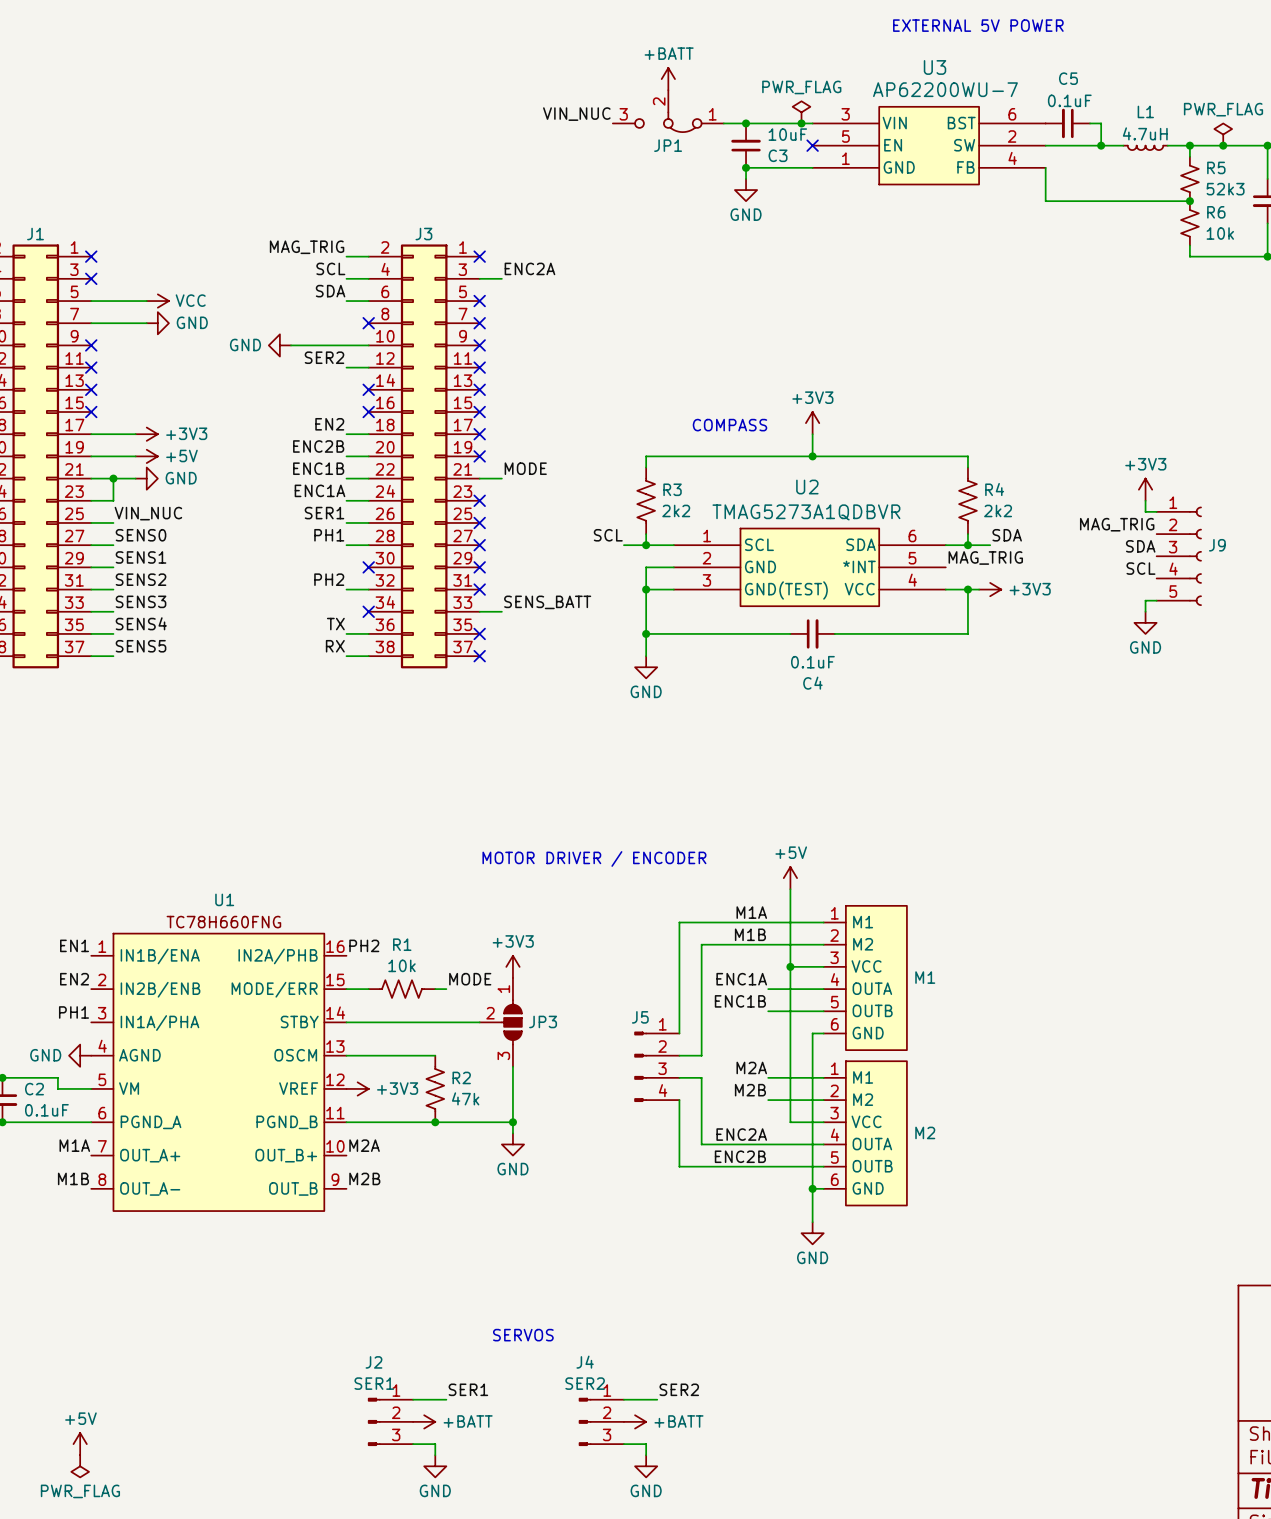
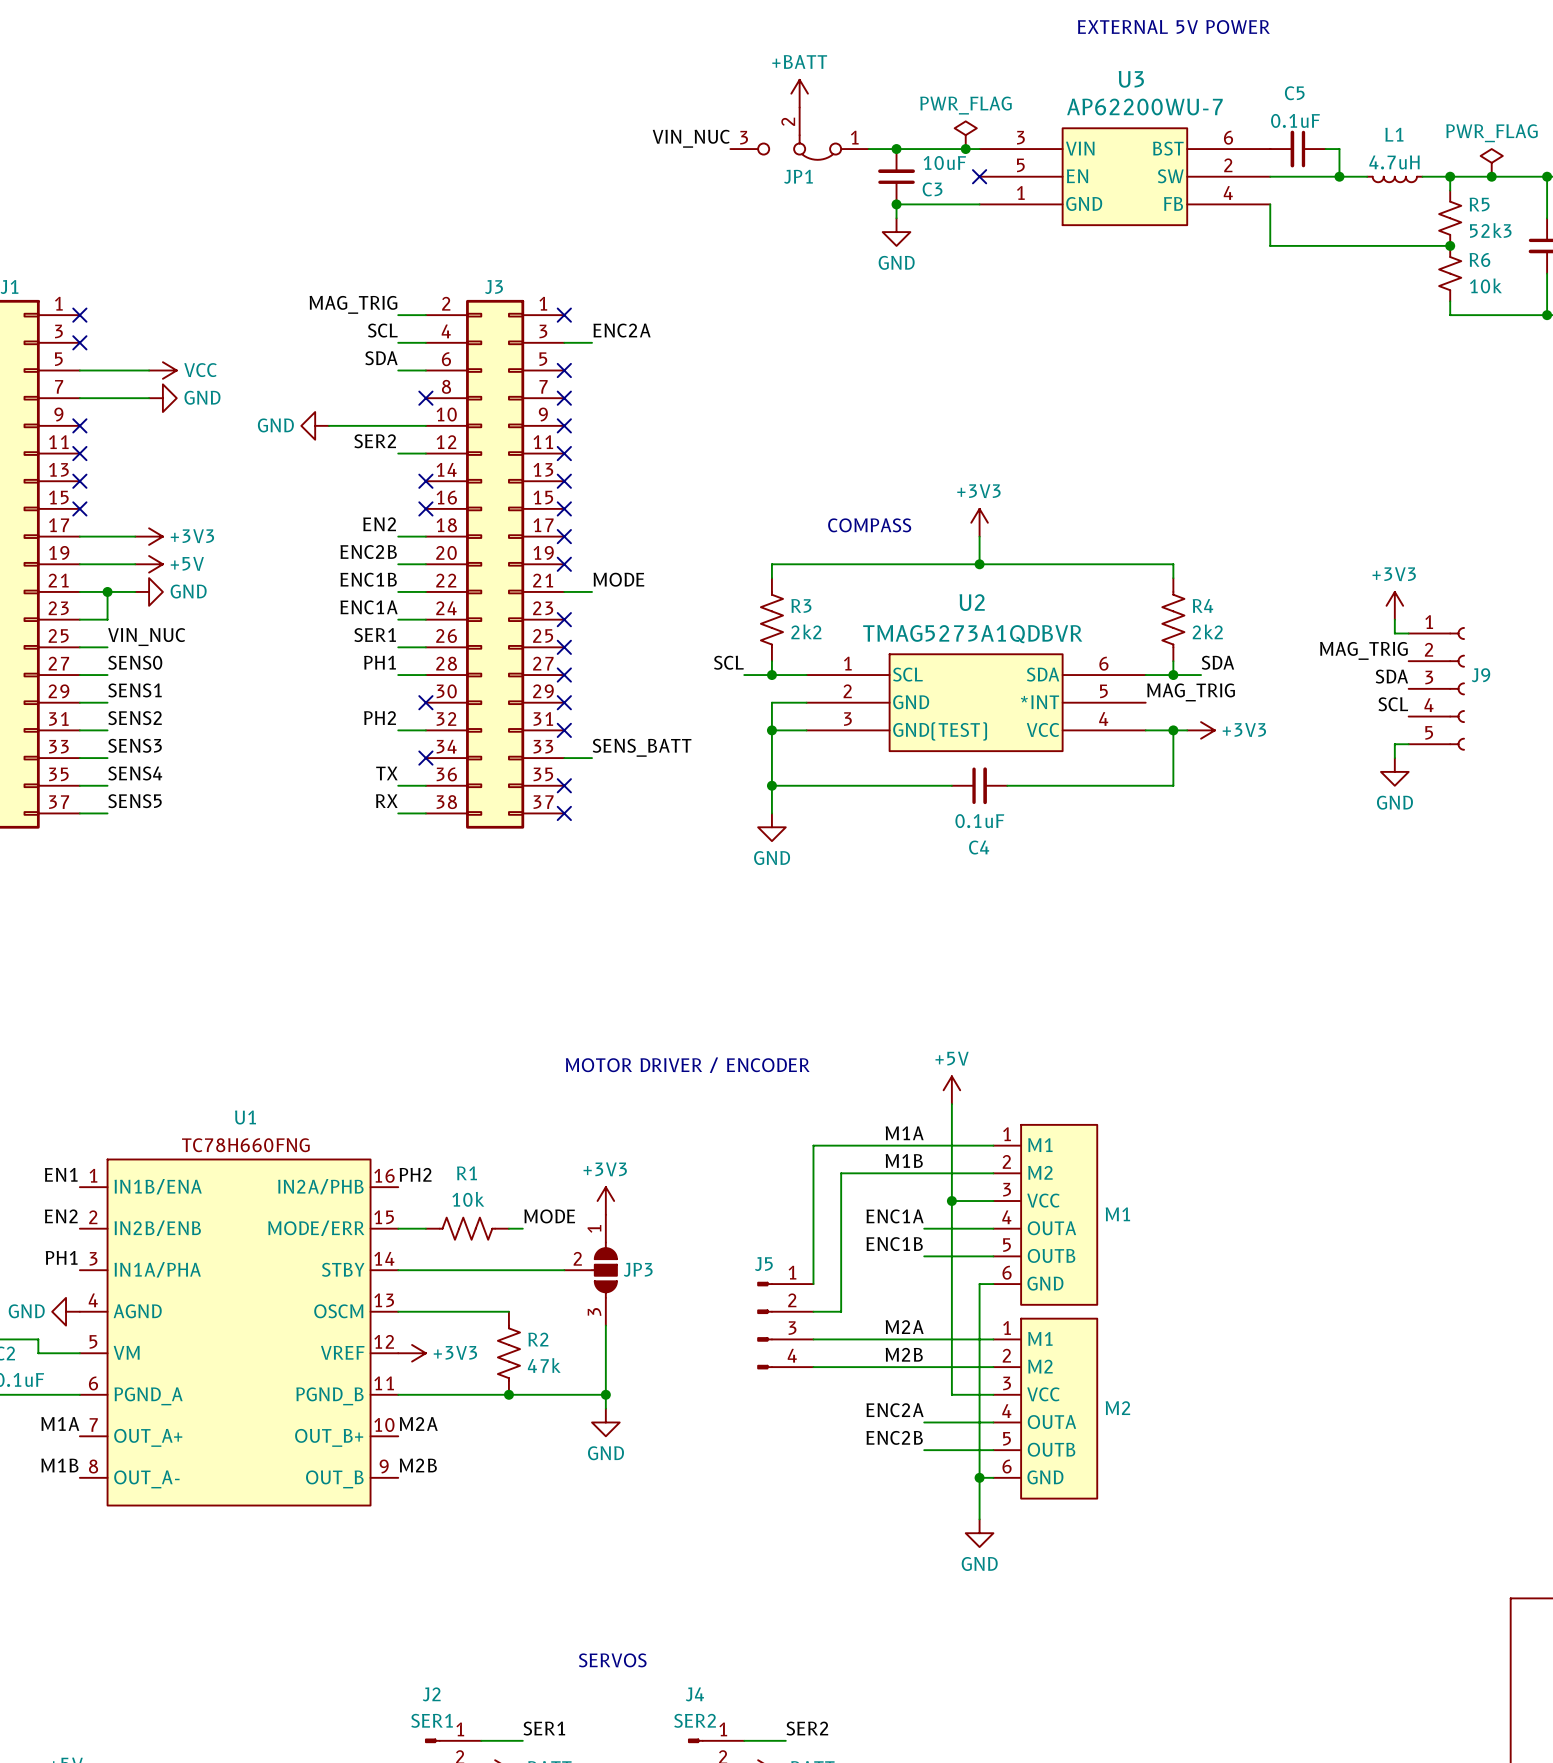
wire: (701, 1077) (701, 1144) (768, 1144) -> (841, 1339) (924, 1339)
wire: (679, 1100) (679, 1166) (768, 1166) -> (813, 1367) (924, 1367)

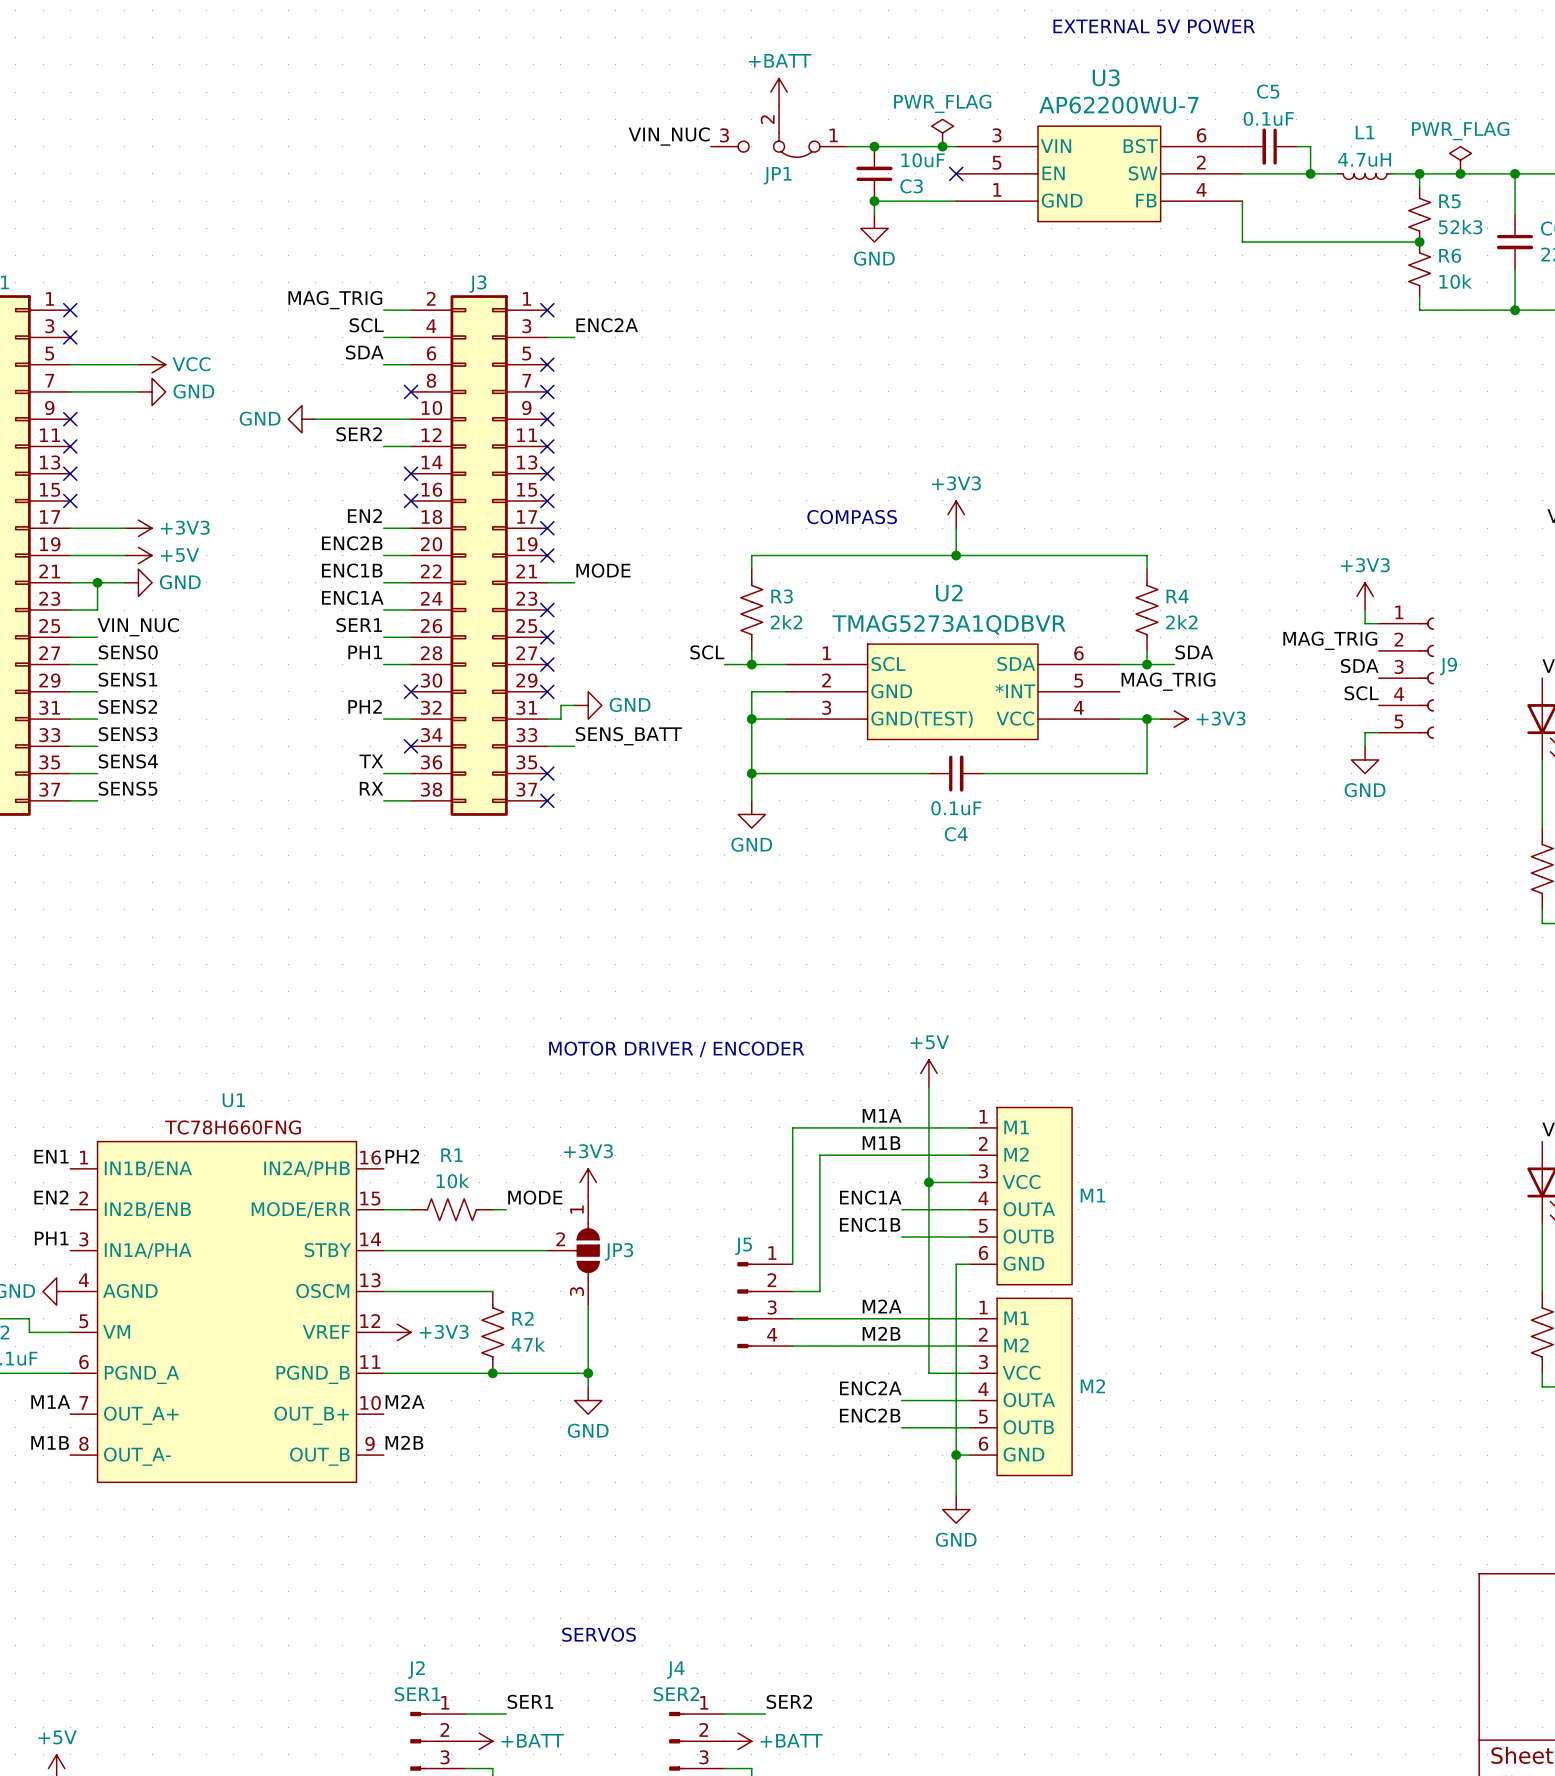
wire: none -> (574, 705) (560, 705) (560, 719) (547, 719)
power symbol: none -> GND (588, 705)
no-connect mark: (564, 730) -> none

